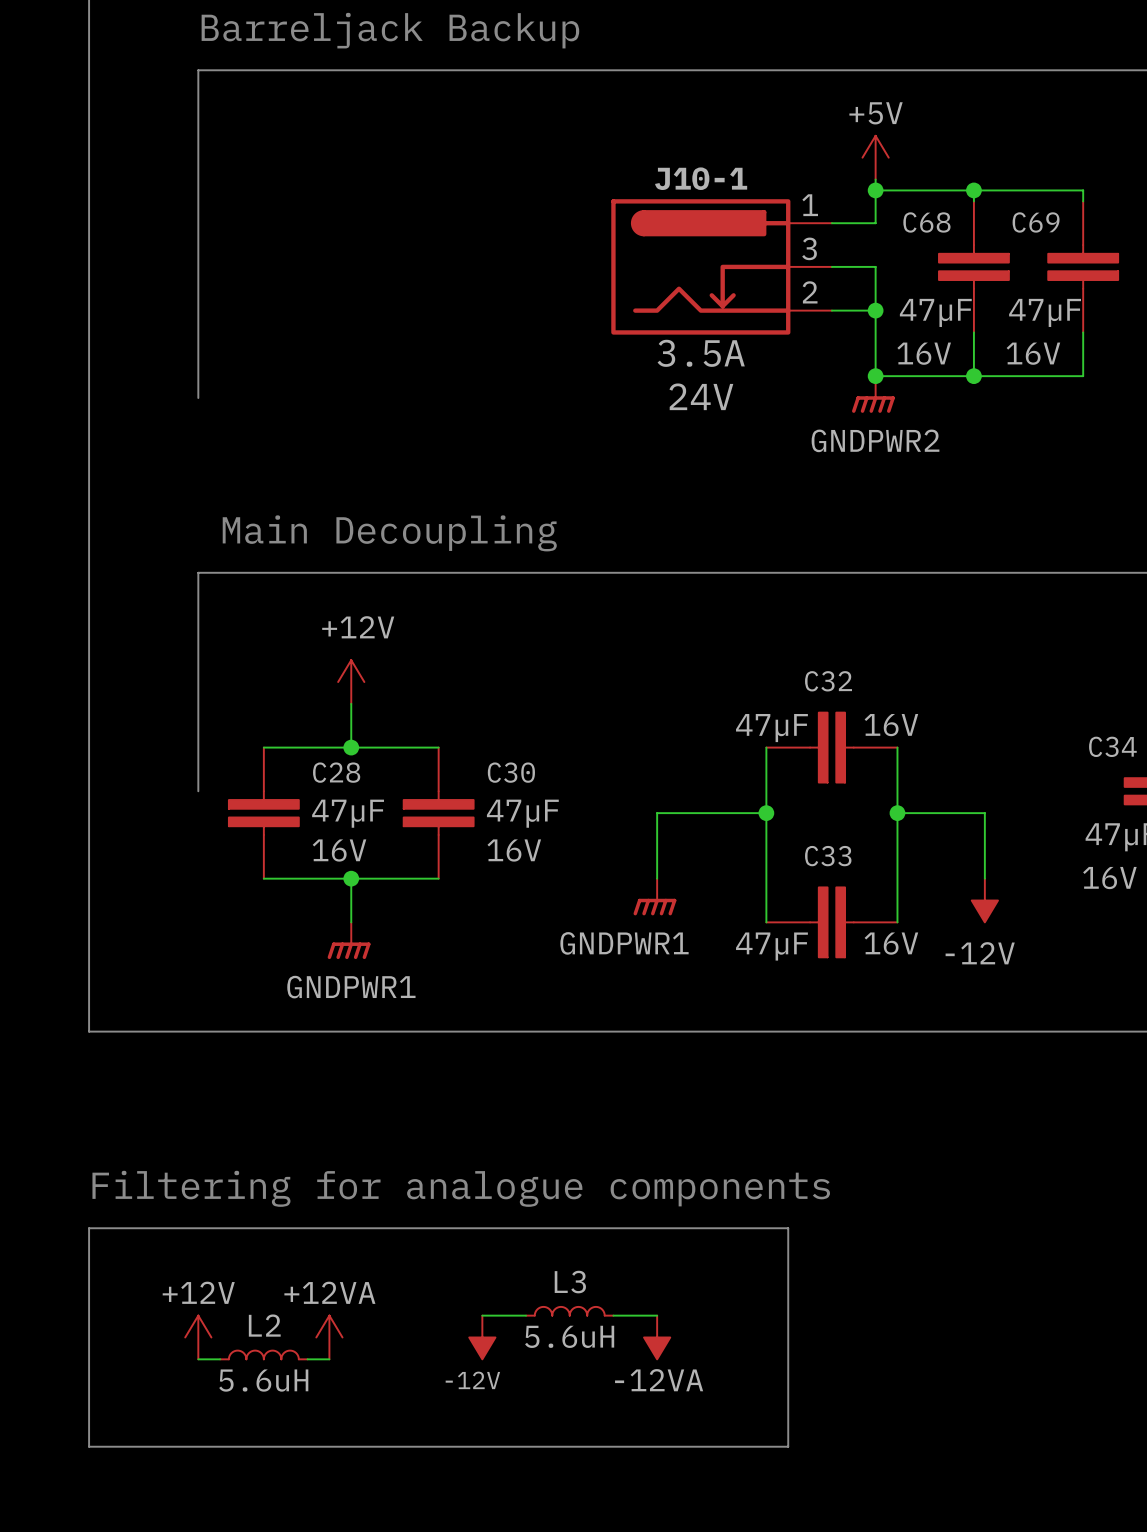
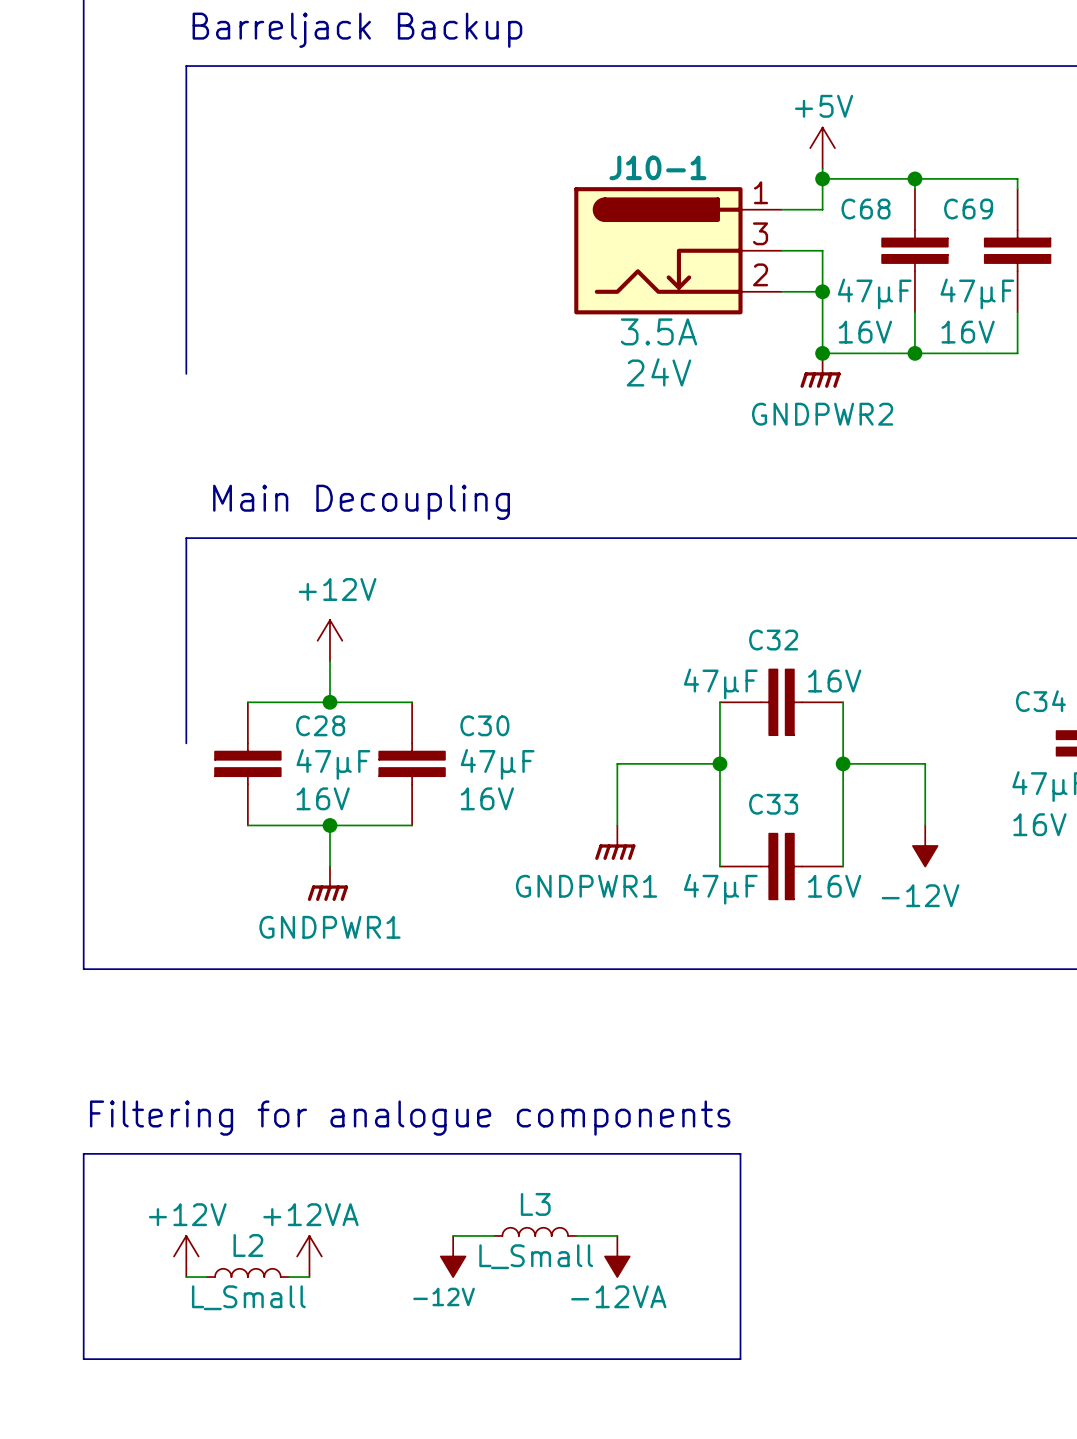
L3 value: 5.6uH (569, 1336) -> L_Small (536, 1256)
L2 value: 5.6uH (263, 1380) -> L_Small (248, 1297)

